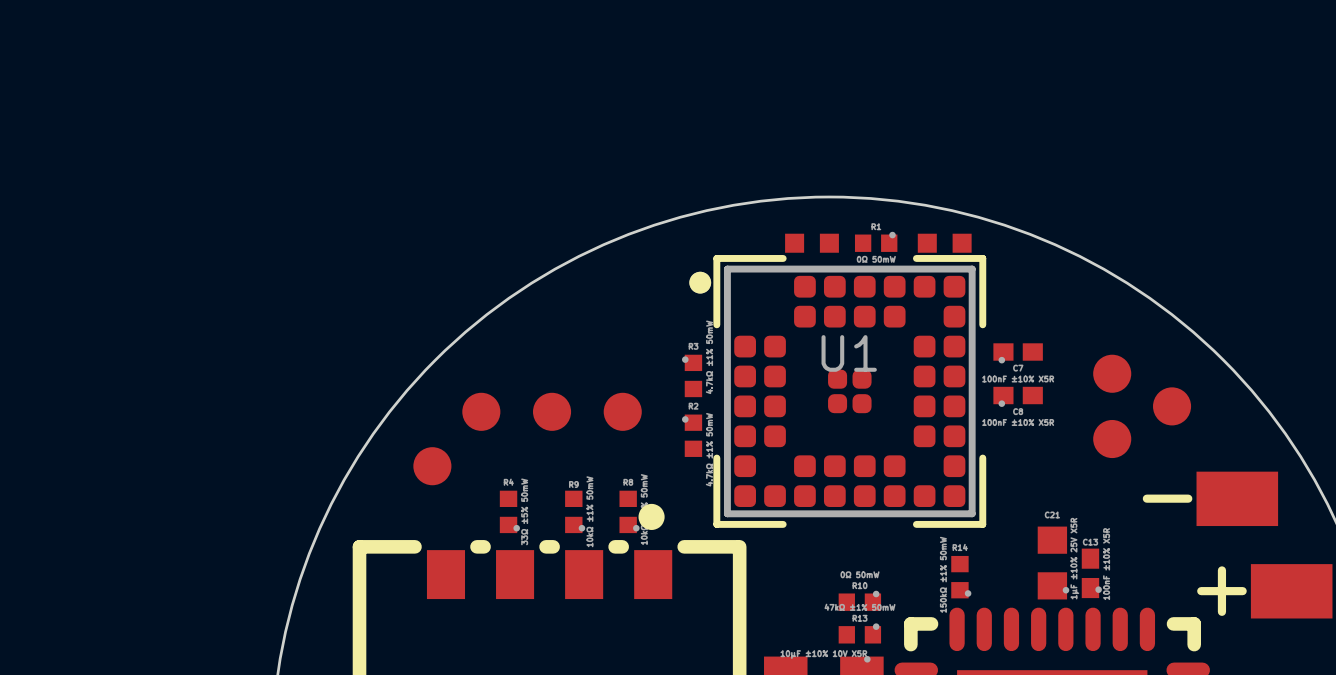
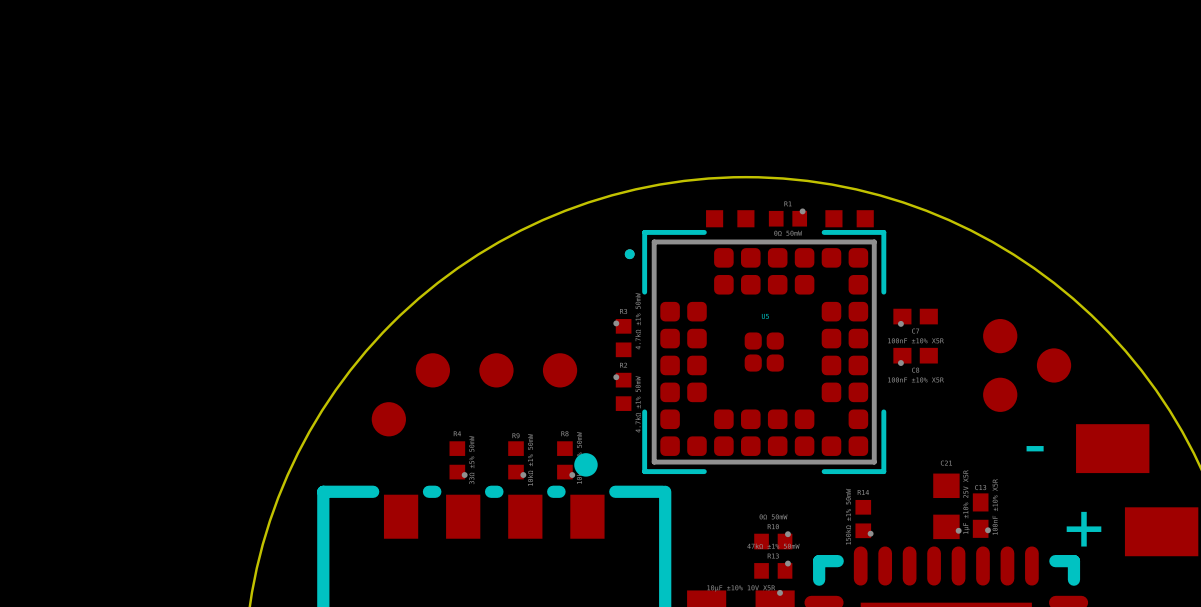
U1: (837, 391) -> none
part: none -> (755, 352)

